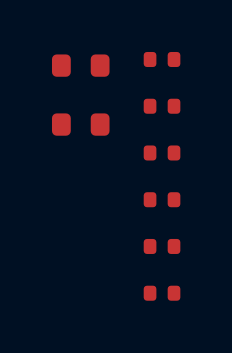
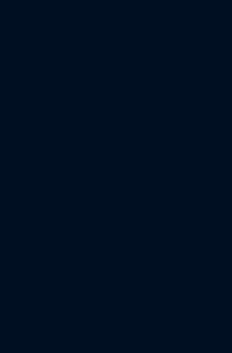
part: (162, 59) -> none
part: (80, 65) -> none
part: (162, 106) -> none
part: (80, 124) -> none
part: (162, 152) -> none
part: (162, 199) -> none
part: (162, 246) -> none
part: (162, 293) -> none

